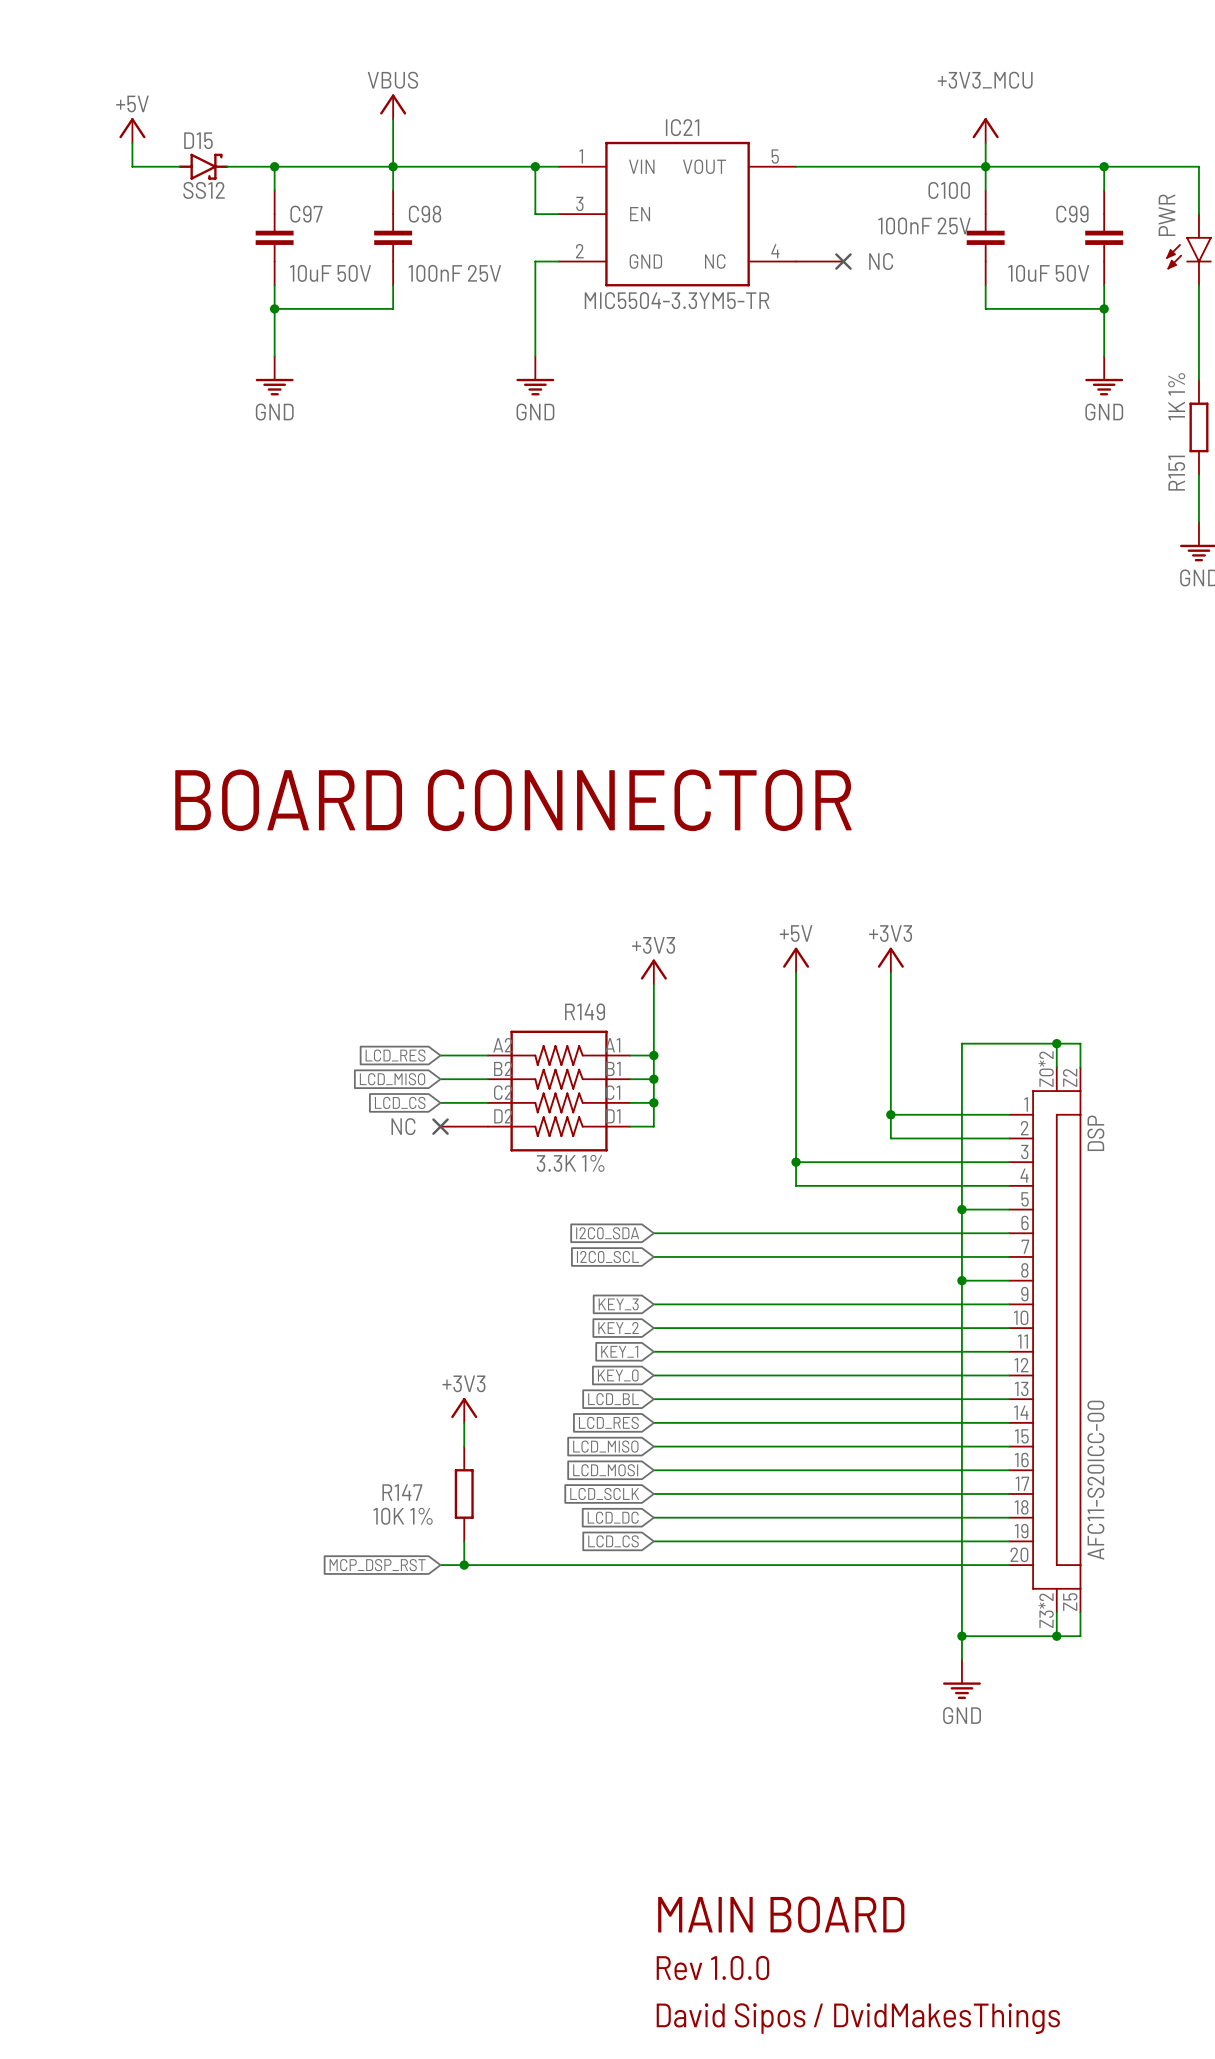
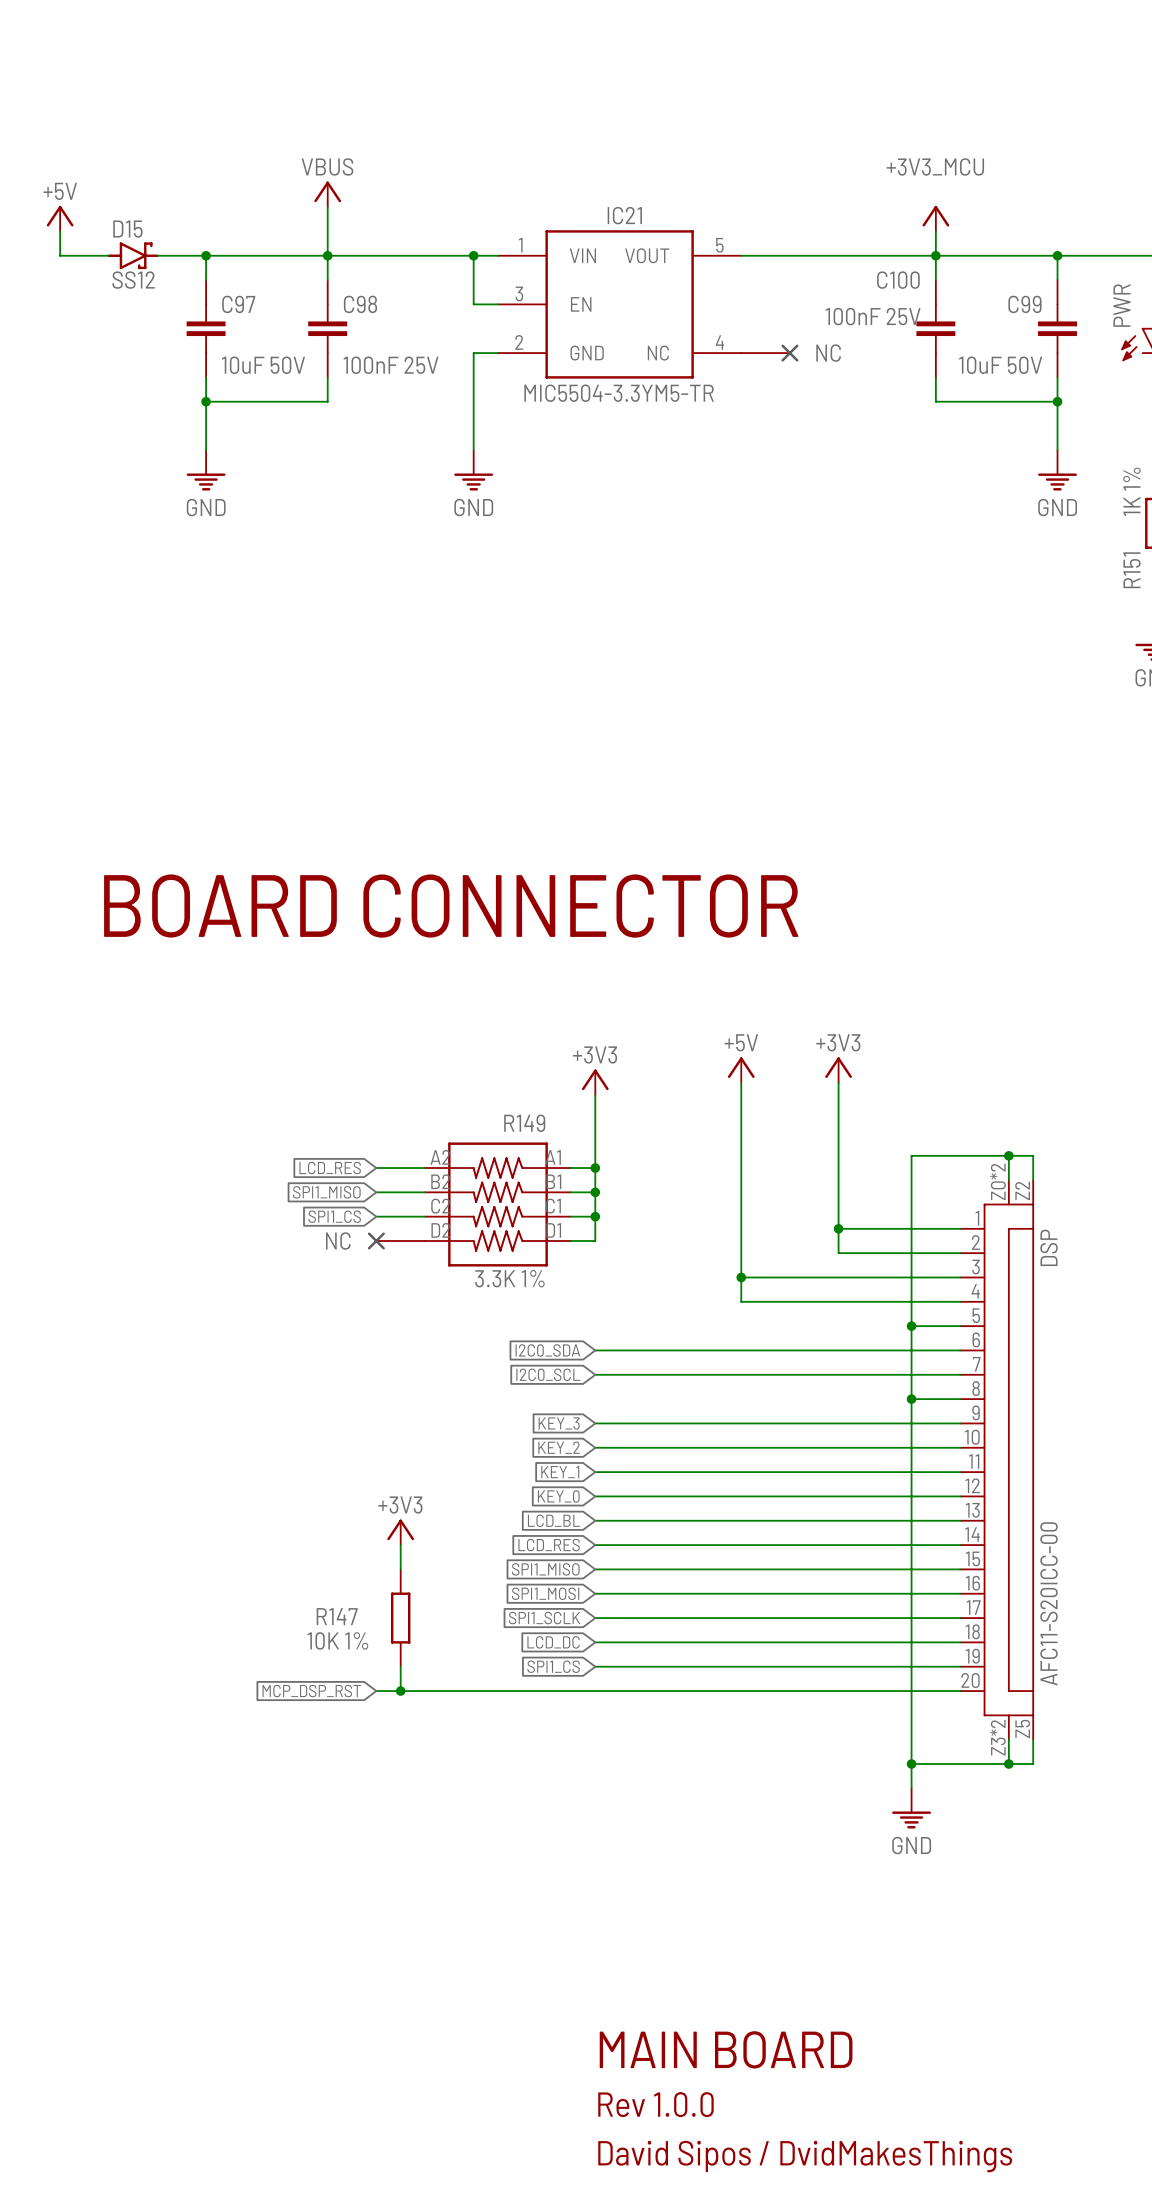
global label: LCD_MISO (392, 1079) -> SPI1_MISO (326, 1192)
global label: LCD_CS (400, 1102) -> SPI1_CS (334, 1216)
global label: LCD_MISO (605, 1446) -> SPI1_MISO (545, 1569)
global label: LCD_MOSI (605, 1470) -> SPI1_MOSI (545, 1593)
global label: LCD_SCLK (604, 1493) -> SPI1_SCLK (544, 1618)
global label: LCD_CS (613, 1541) -> SPI1_CS (553, 1666)

